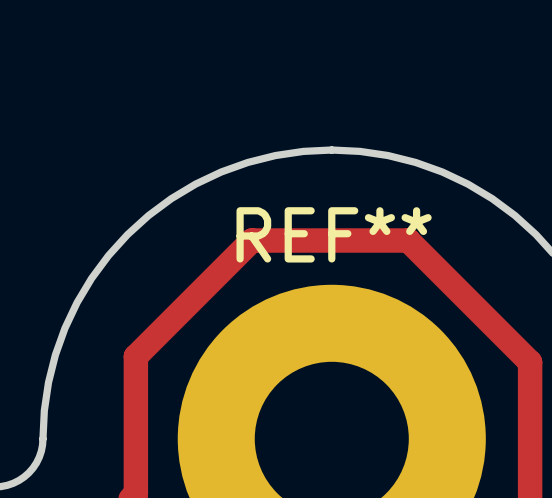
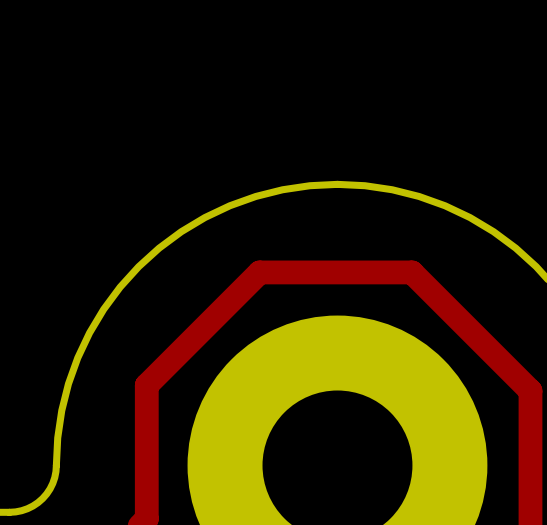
REF** name: REF** (334, 234) -> none

